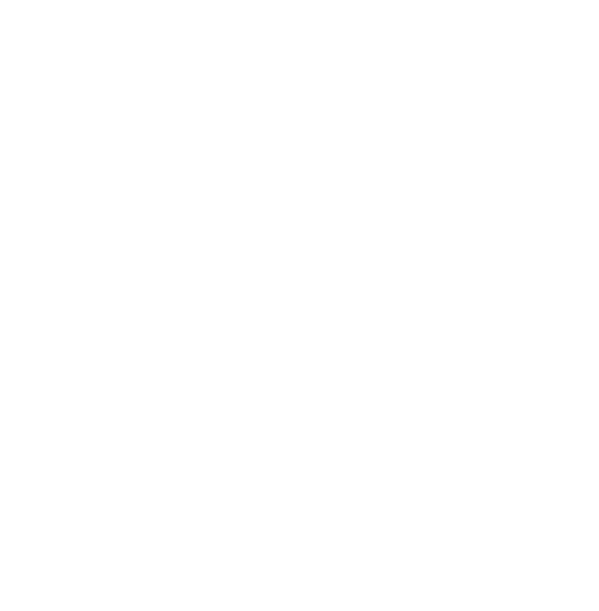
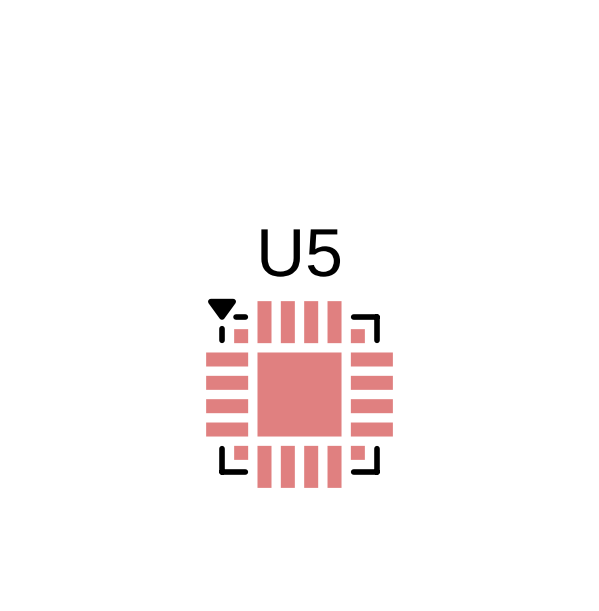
U5: none -> (299, 393)

